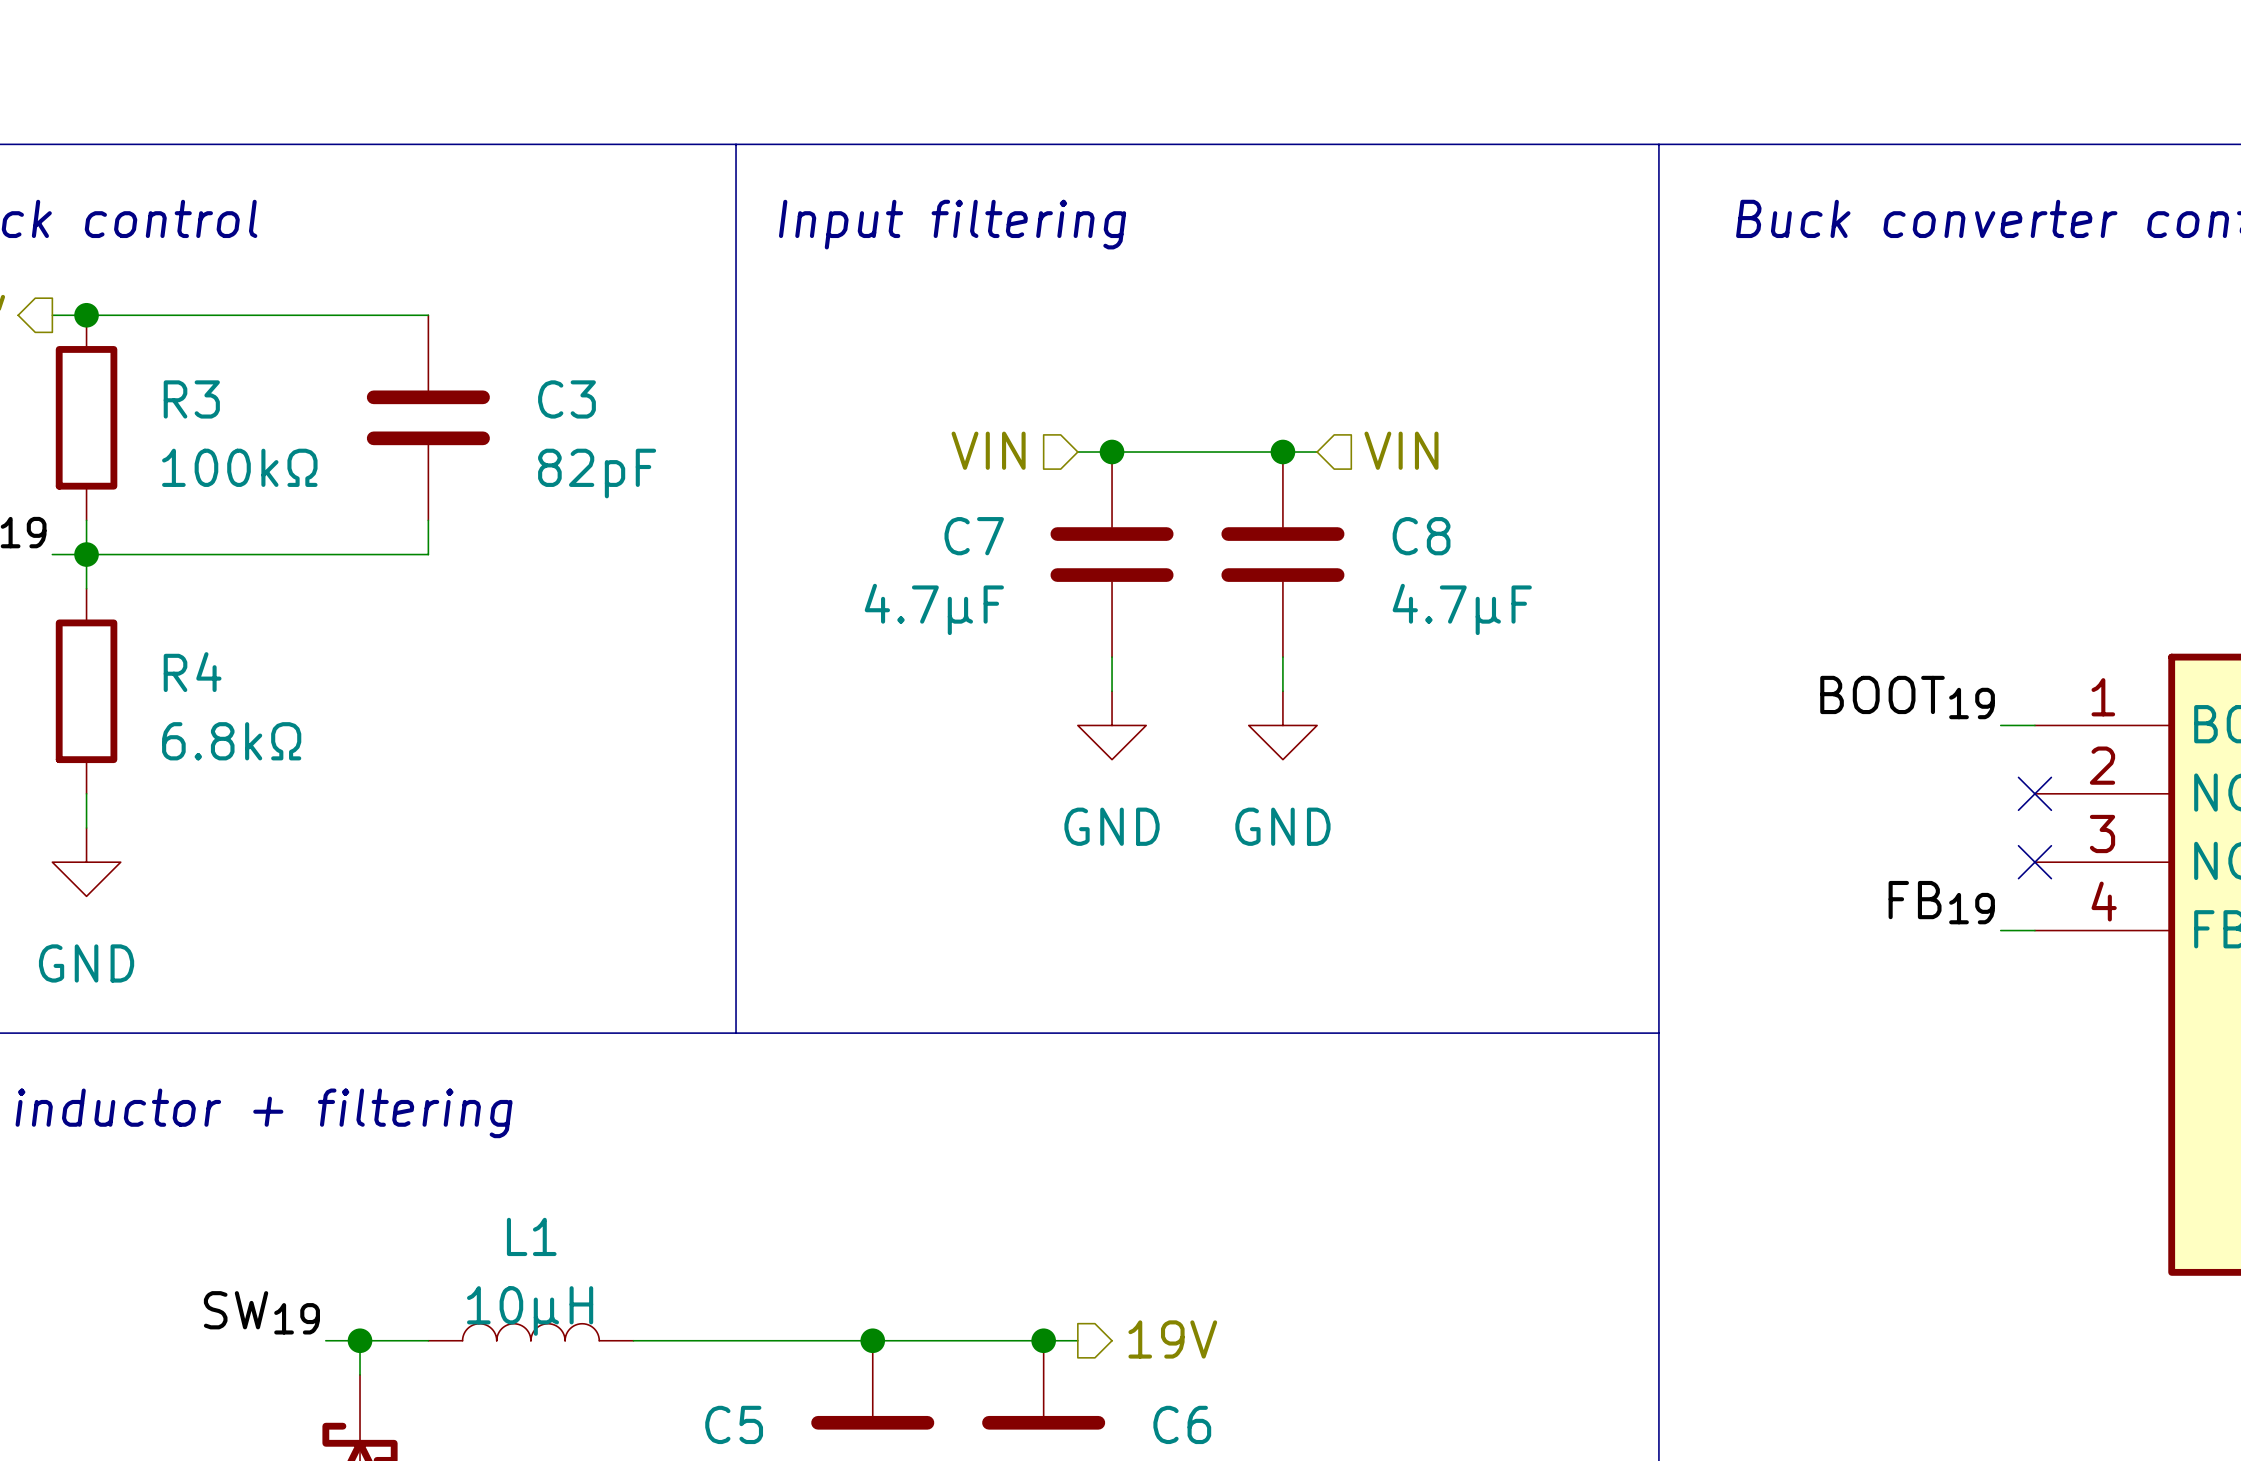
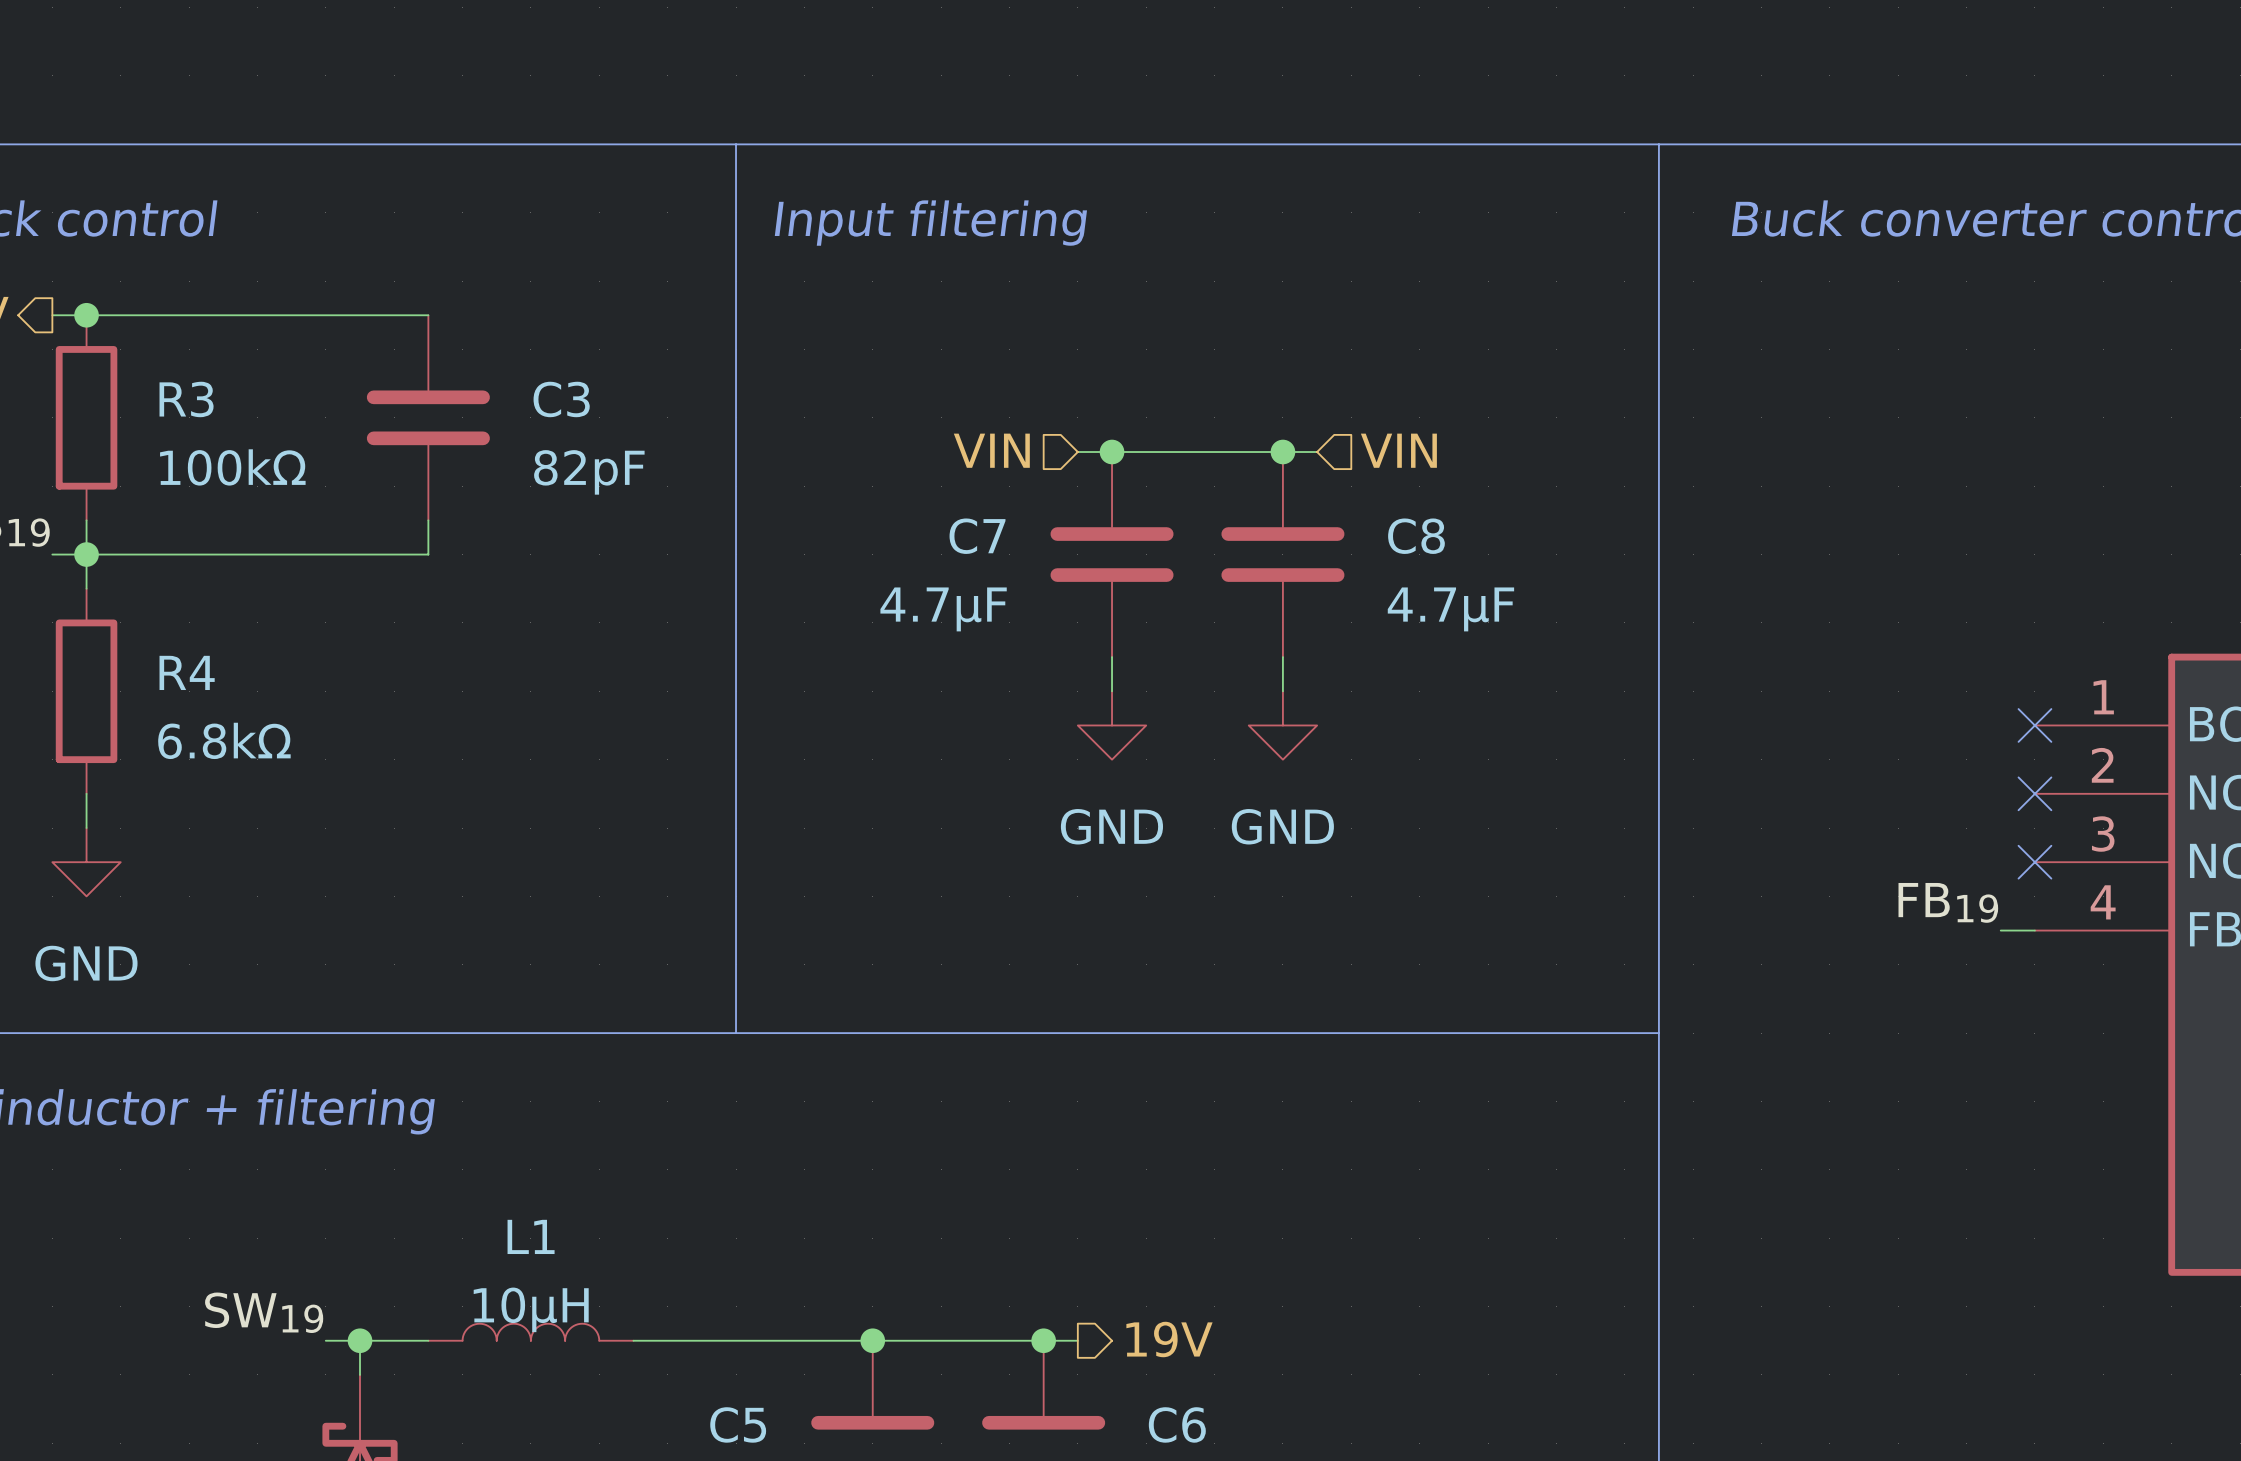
label: BOOT19 (1907, 697) -> none
wire: (2000, 725) (2034, 725) -> none
no-connect mark: none -> (2034, 725)

